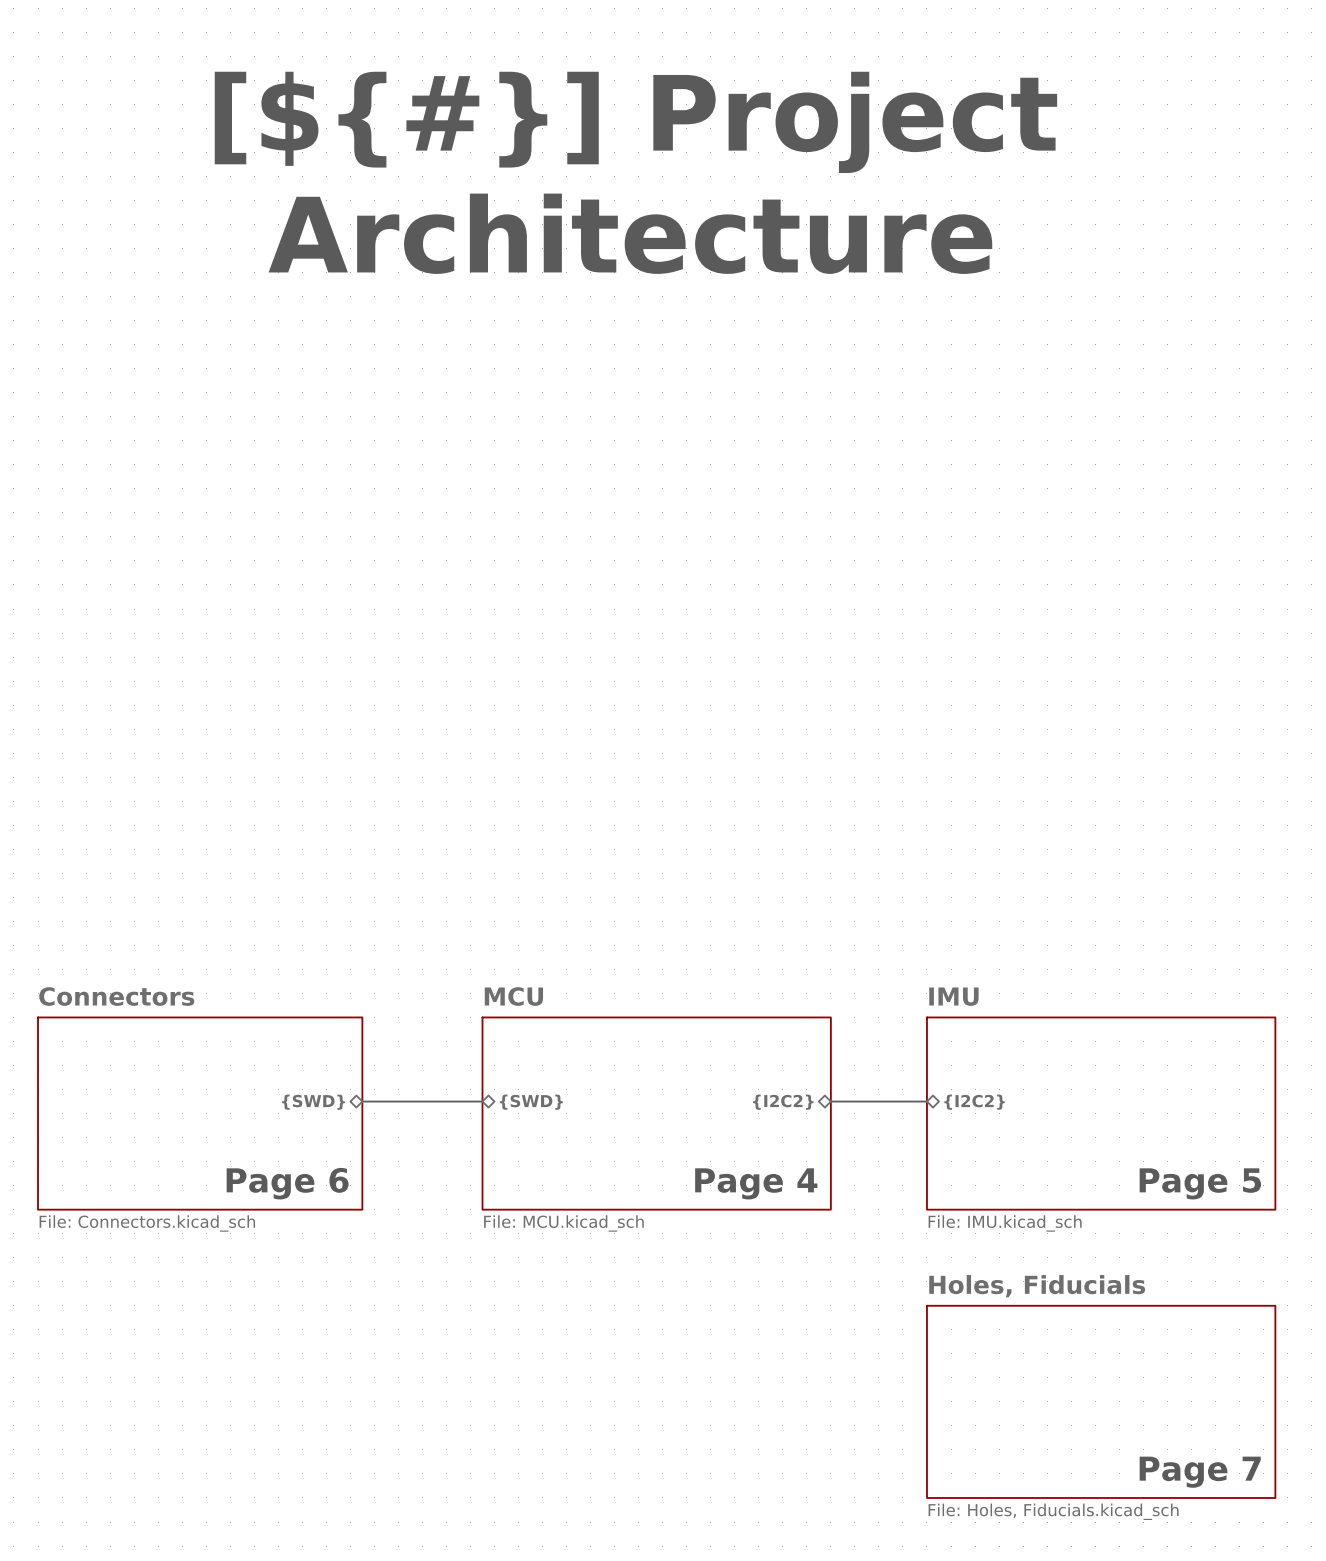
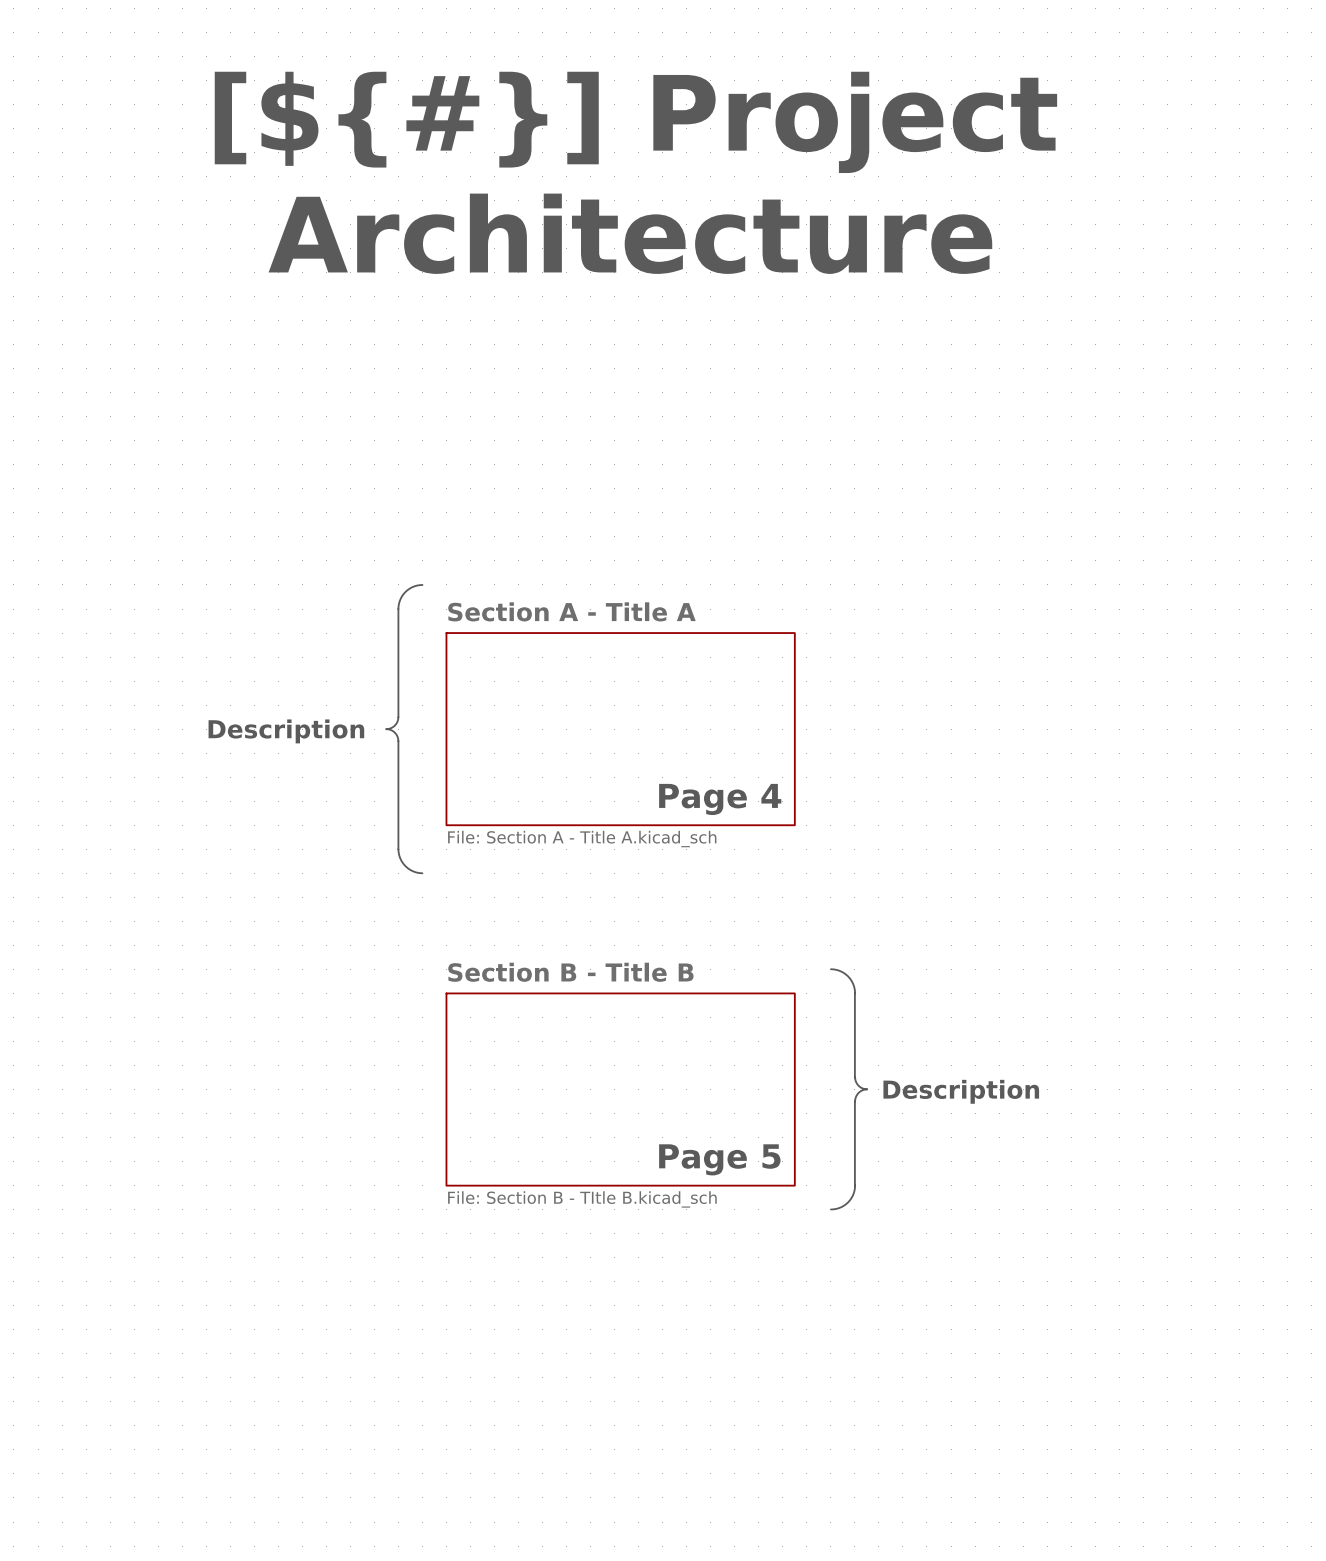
line: none -> (422, 584) (407, 590) (399, 603) (398, 718) (393, 726) (386, 729) (393, 731) (398, 739) (399, 855) (407, 868) (422, 873)
sheet Section A - Title A: none -> File: Section A - Title A.kicad_sch (620, 729)
text: none -> Description (286, 731)
text: none -> Page 4 (720, 799)
line: none -> (831, 969) (840, 971) (848, 976) (853, 984) (855, 993)
line: none -> (854, 993) (854, 1077)
line: none -> (855, 1077) (858, 1085) (867, 1089) (858, 1092) (855, 1101)
sheet Section B - Title B: none -> File: Section B - TItle B.kicad_sch (620, 1089)
text: none -> Description (961, 1091)
bus: (362, 1101) (482, 1101) -> none
bus: (830, 1101) (926, 1101) -> none
line: none -> (854, 1101) (854, 1185)
sheet pin: {SWD} (313, 1102) -> none
sheet pin: {SWD} (531, 1102) -> none
sheet pin: {I2C2} (783, 1102) -> none
sheet pin: {I2C2} (974, 1102) -> none
sheet Connectors: File: Connectors.kicad_sch (200, 1113) -> none
sheet MCU: File: MCU.kicad_sch (656, 1113) -> none
sheet IMU: File: IMU.kicad_sch (1101, 1113) -> none
text: Page 6 (287, 1183) -> none
text: Page 4 (756, 1183) -> Page 5 (719, 1159)
text: Page 5 (1200, 1183) -> none
line: none -> (855, 1185) (853, 1193) (848, 1202) (839, 1208) (831, 1209)
sheet Holes, Fiducials: File: Holes, Fiducials.kicad_sch (1101, 1401) -> none
text: Page 7 (1200, 1472) -> none

